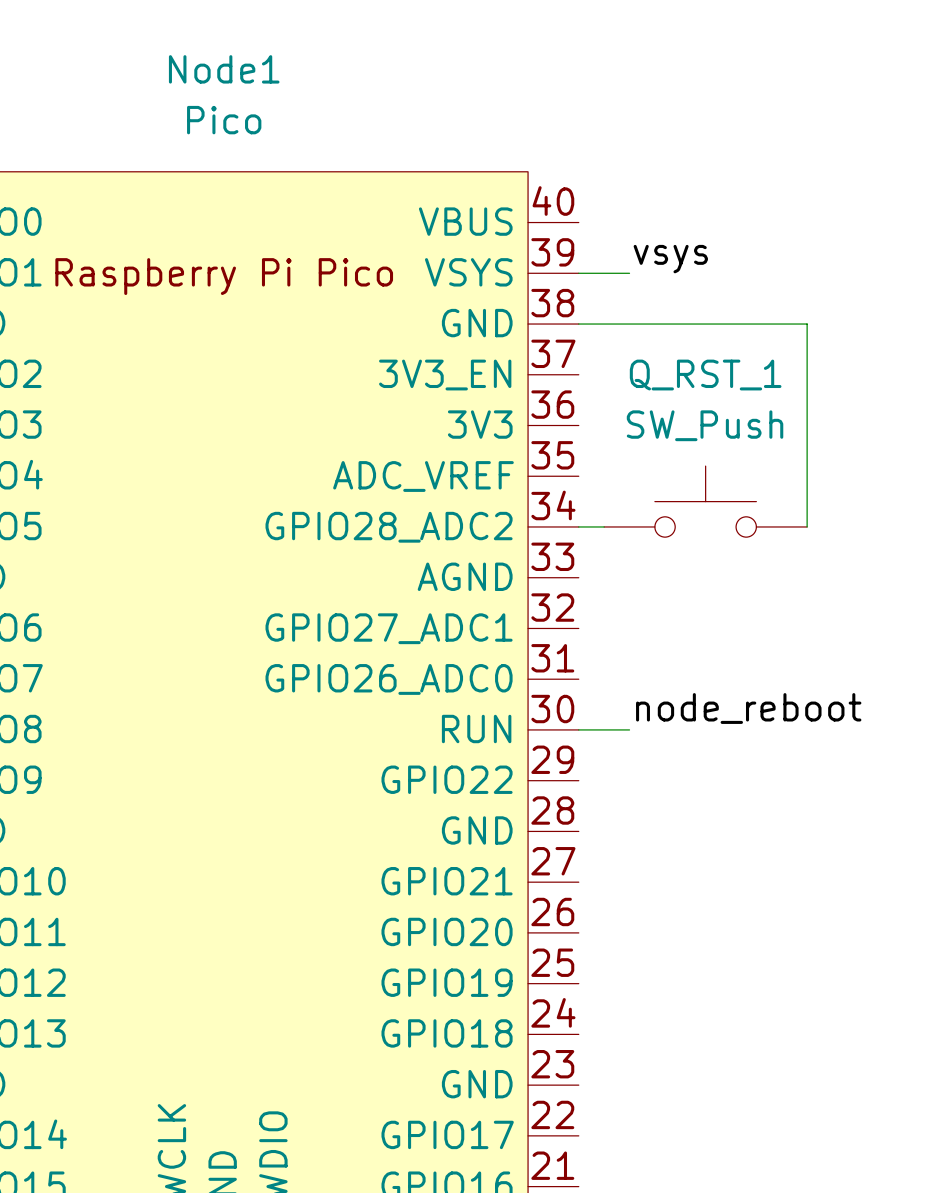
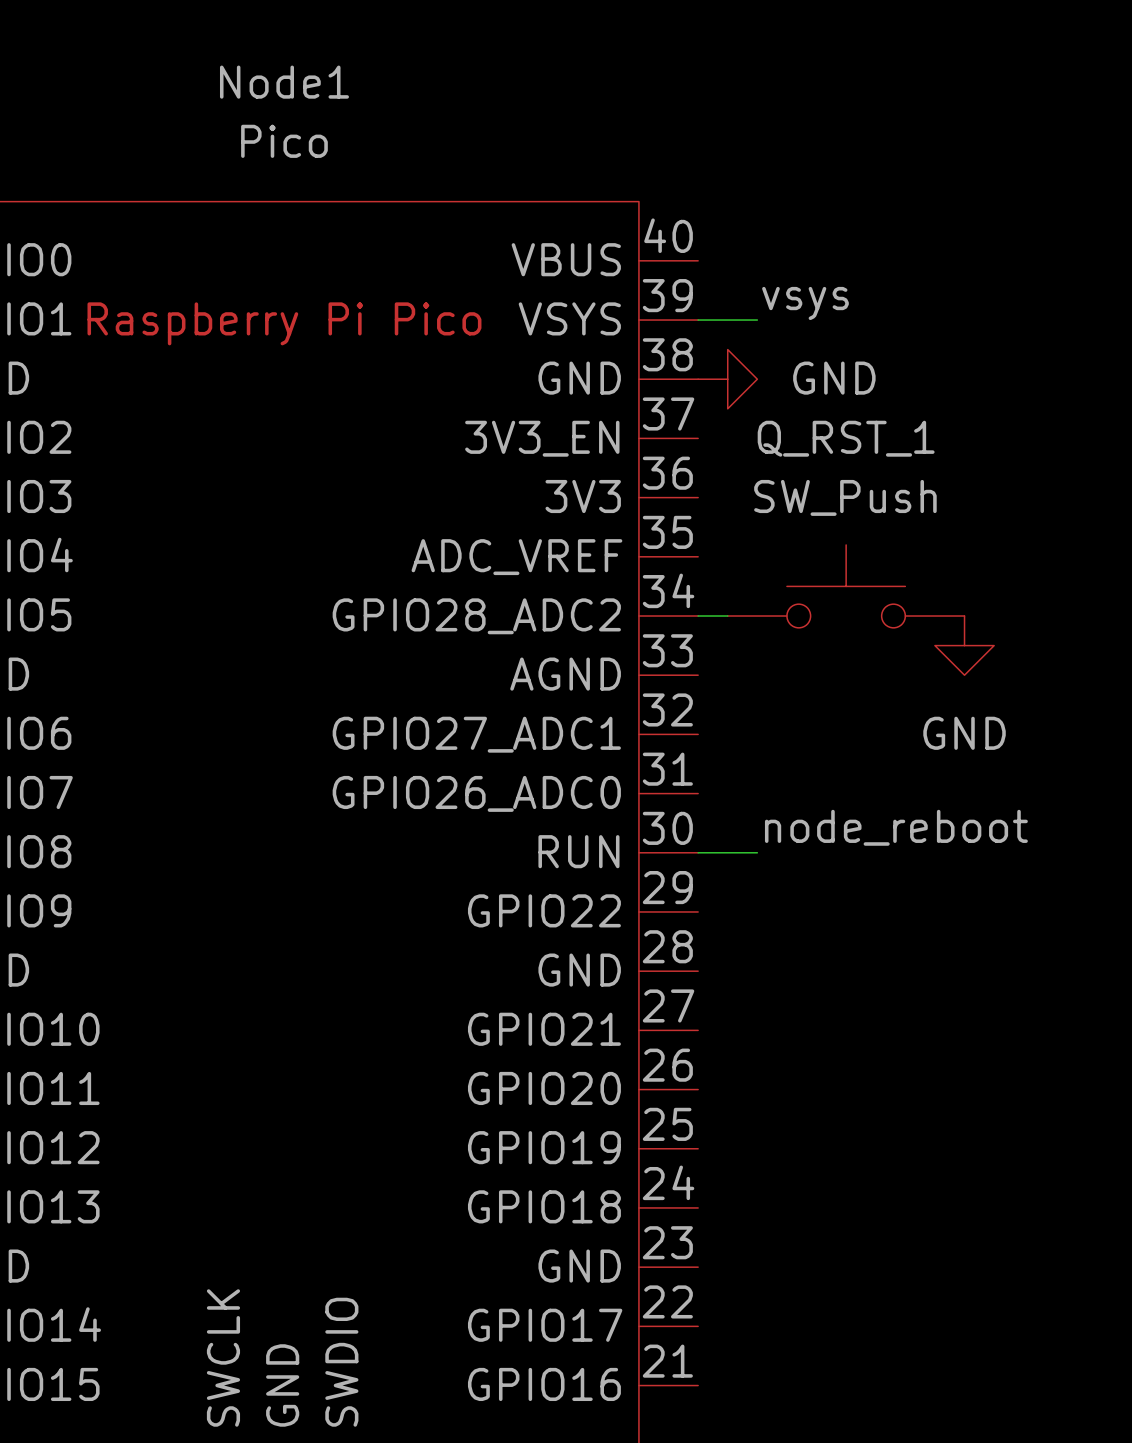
wire: (578, 324) (807, 324) (807, 526) -> none
power symbol: none -> GND (727, 379)
power symbol: none -> GND (964, 645)

